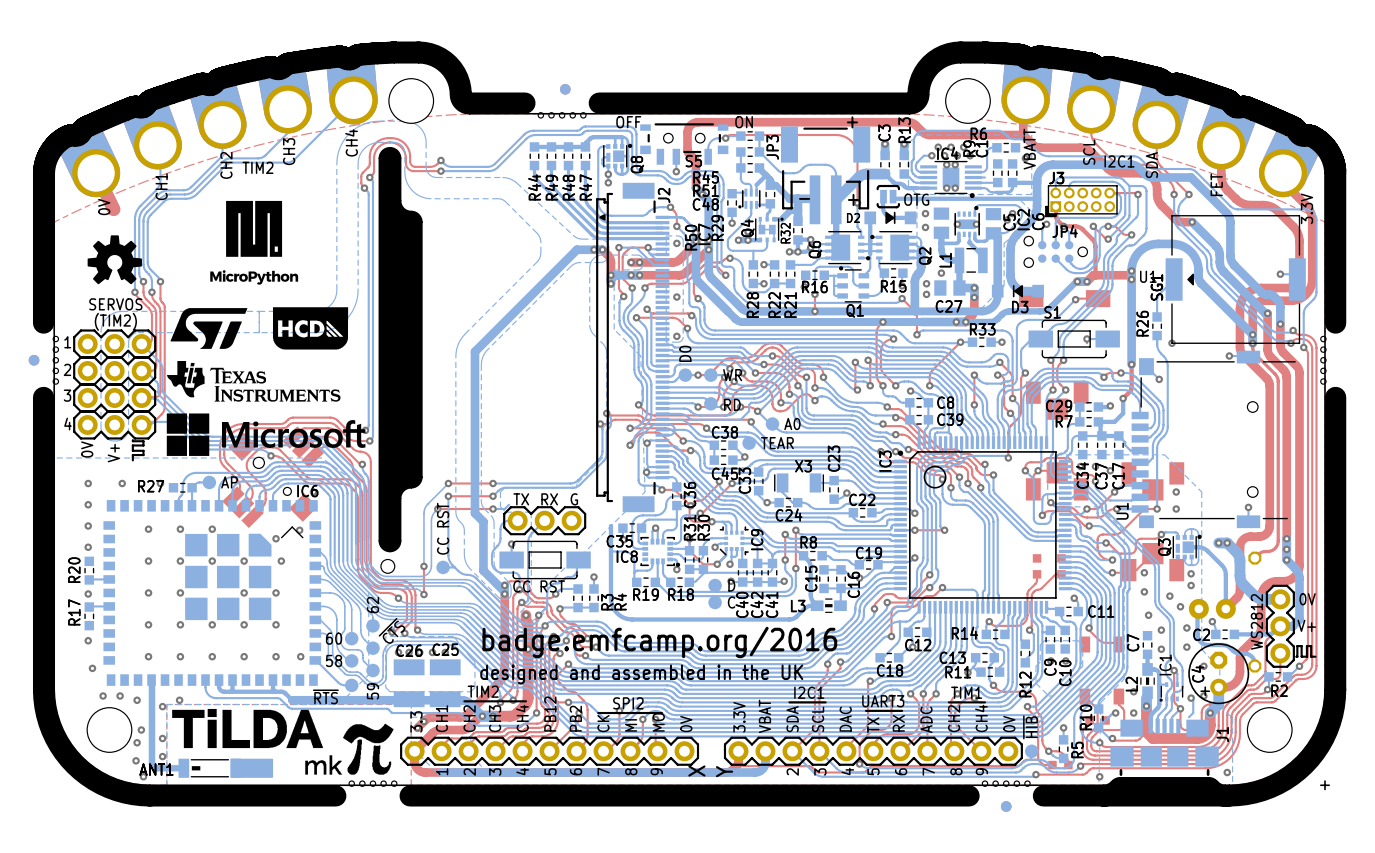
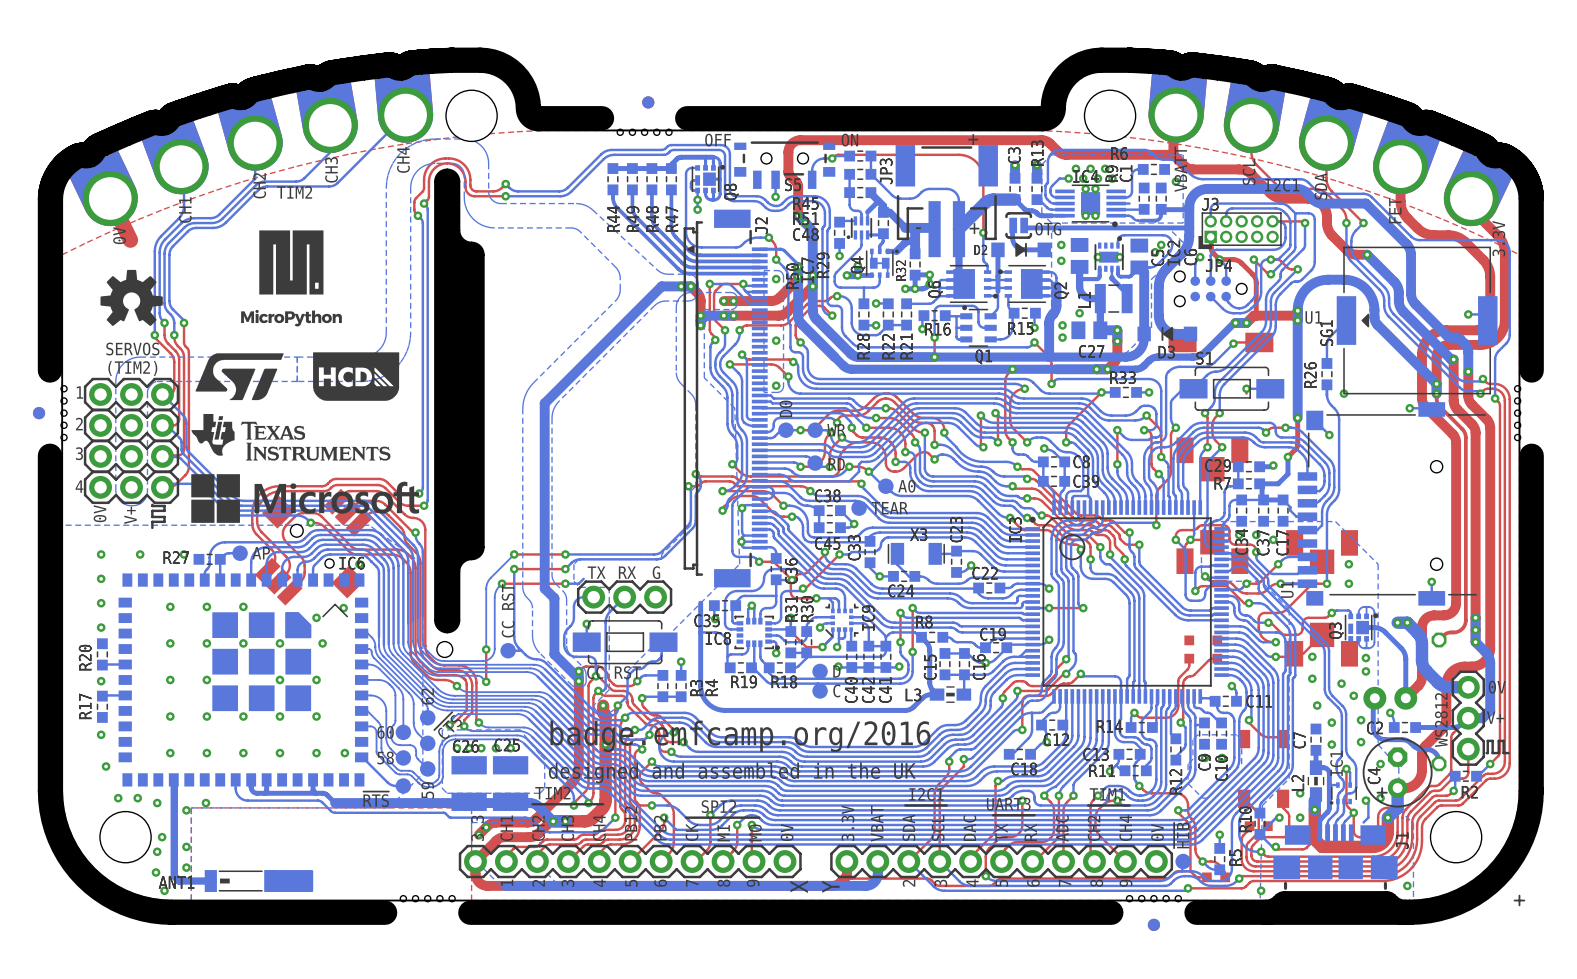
drawing: [172, 708, 394, 775] -> none

